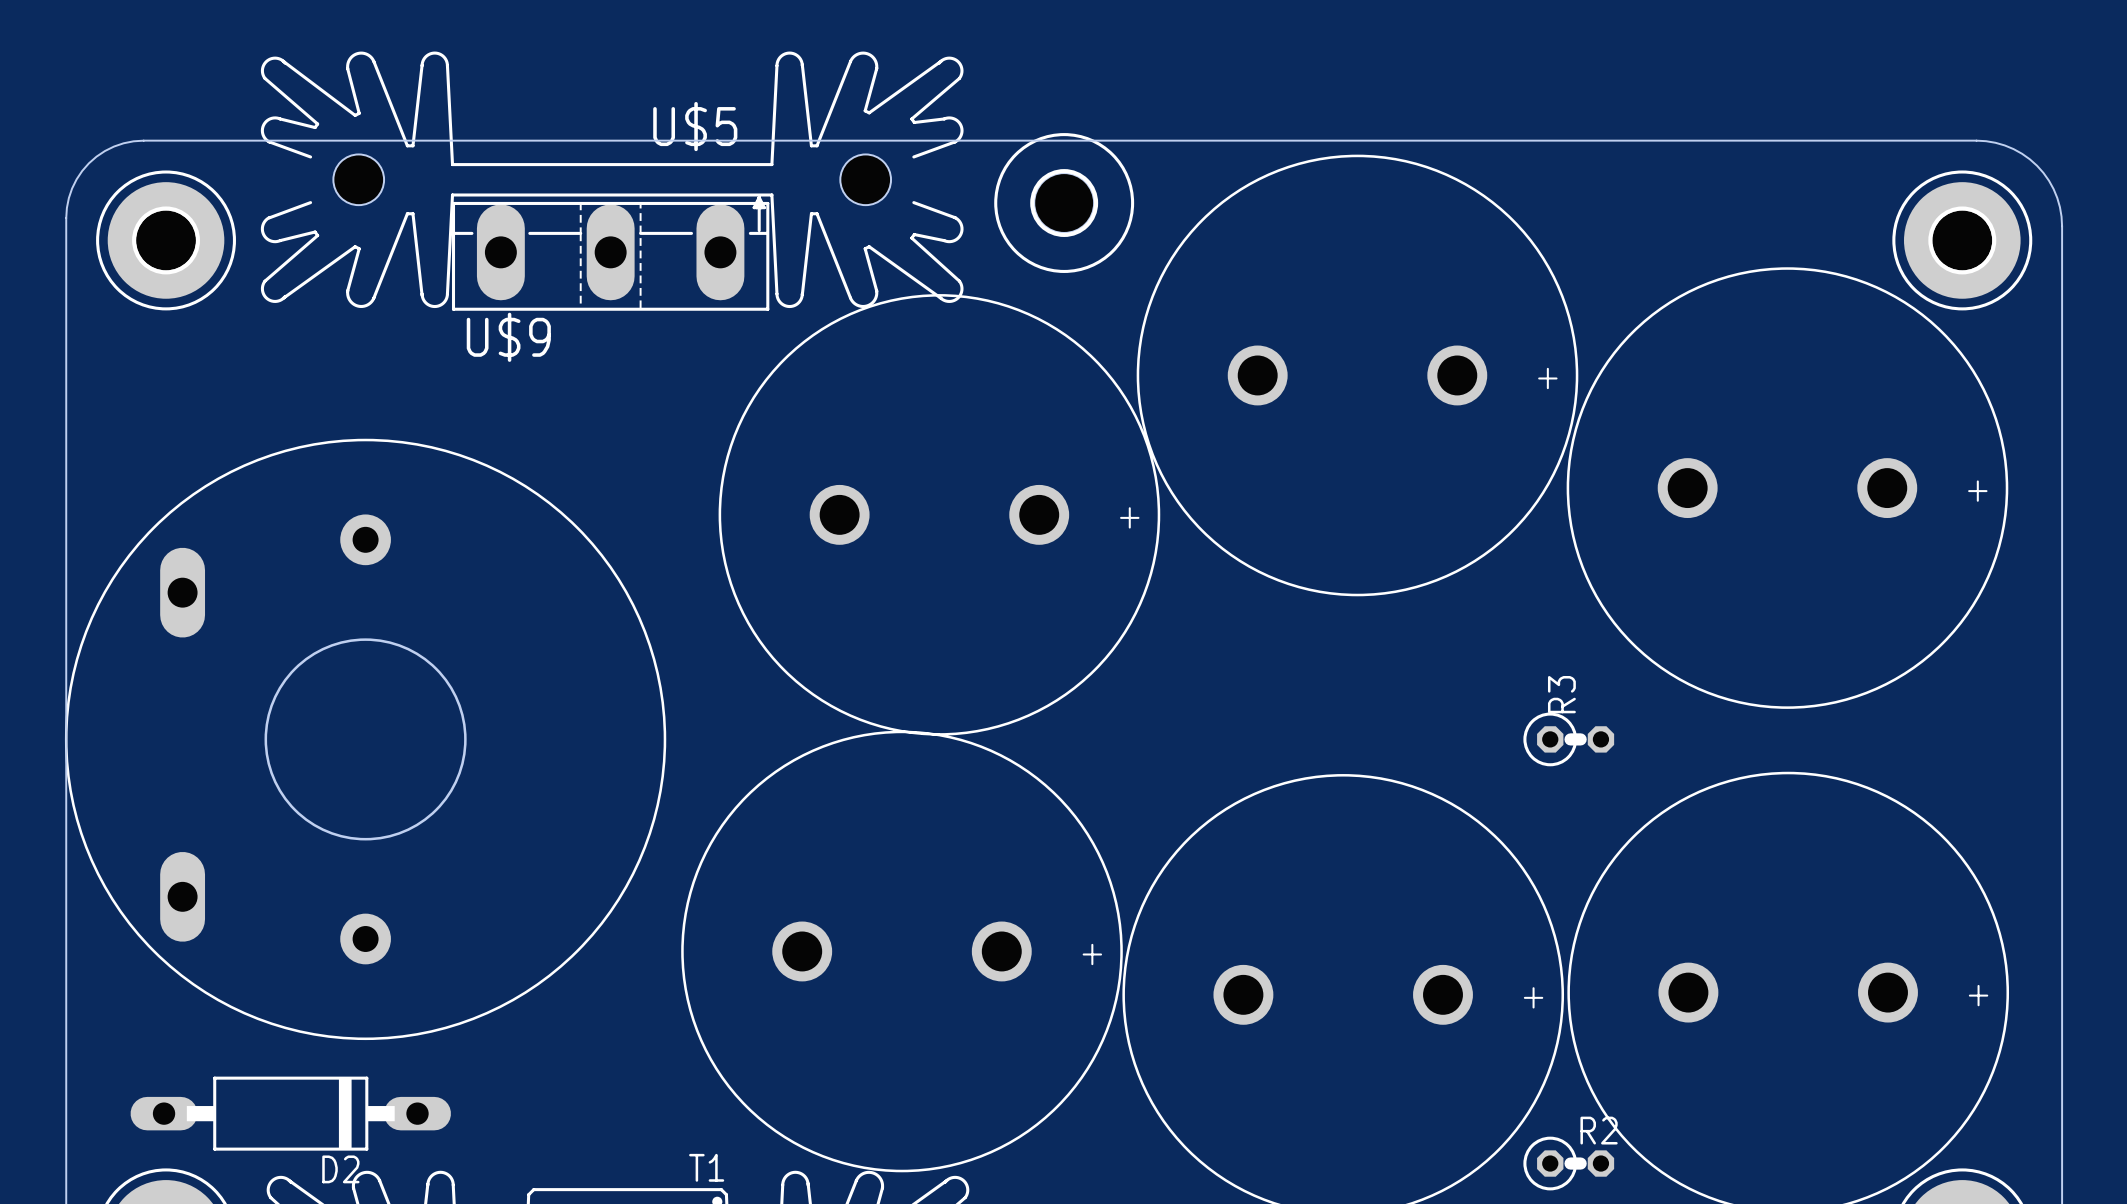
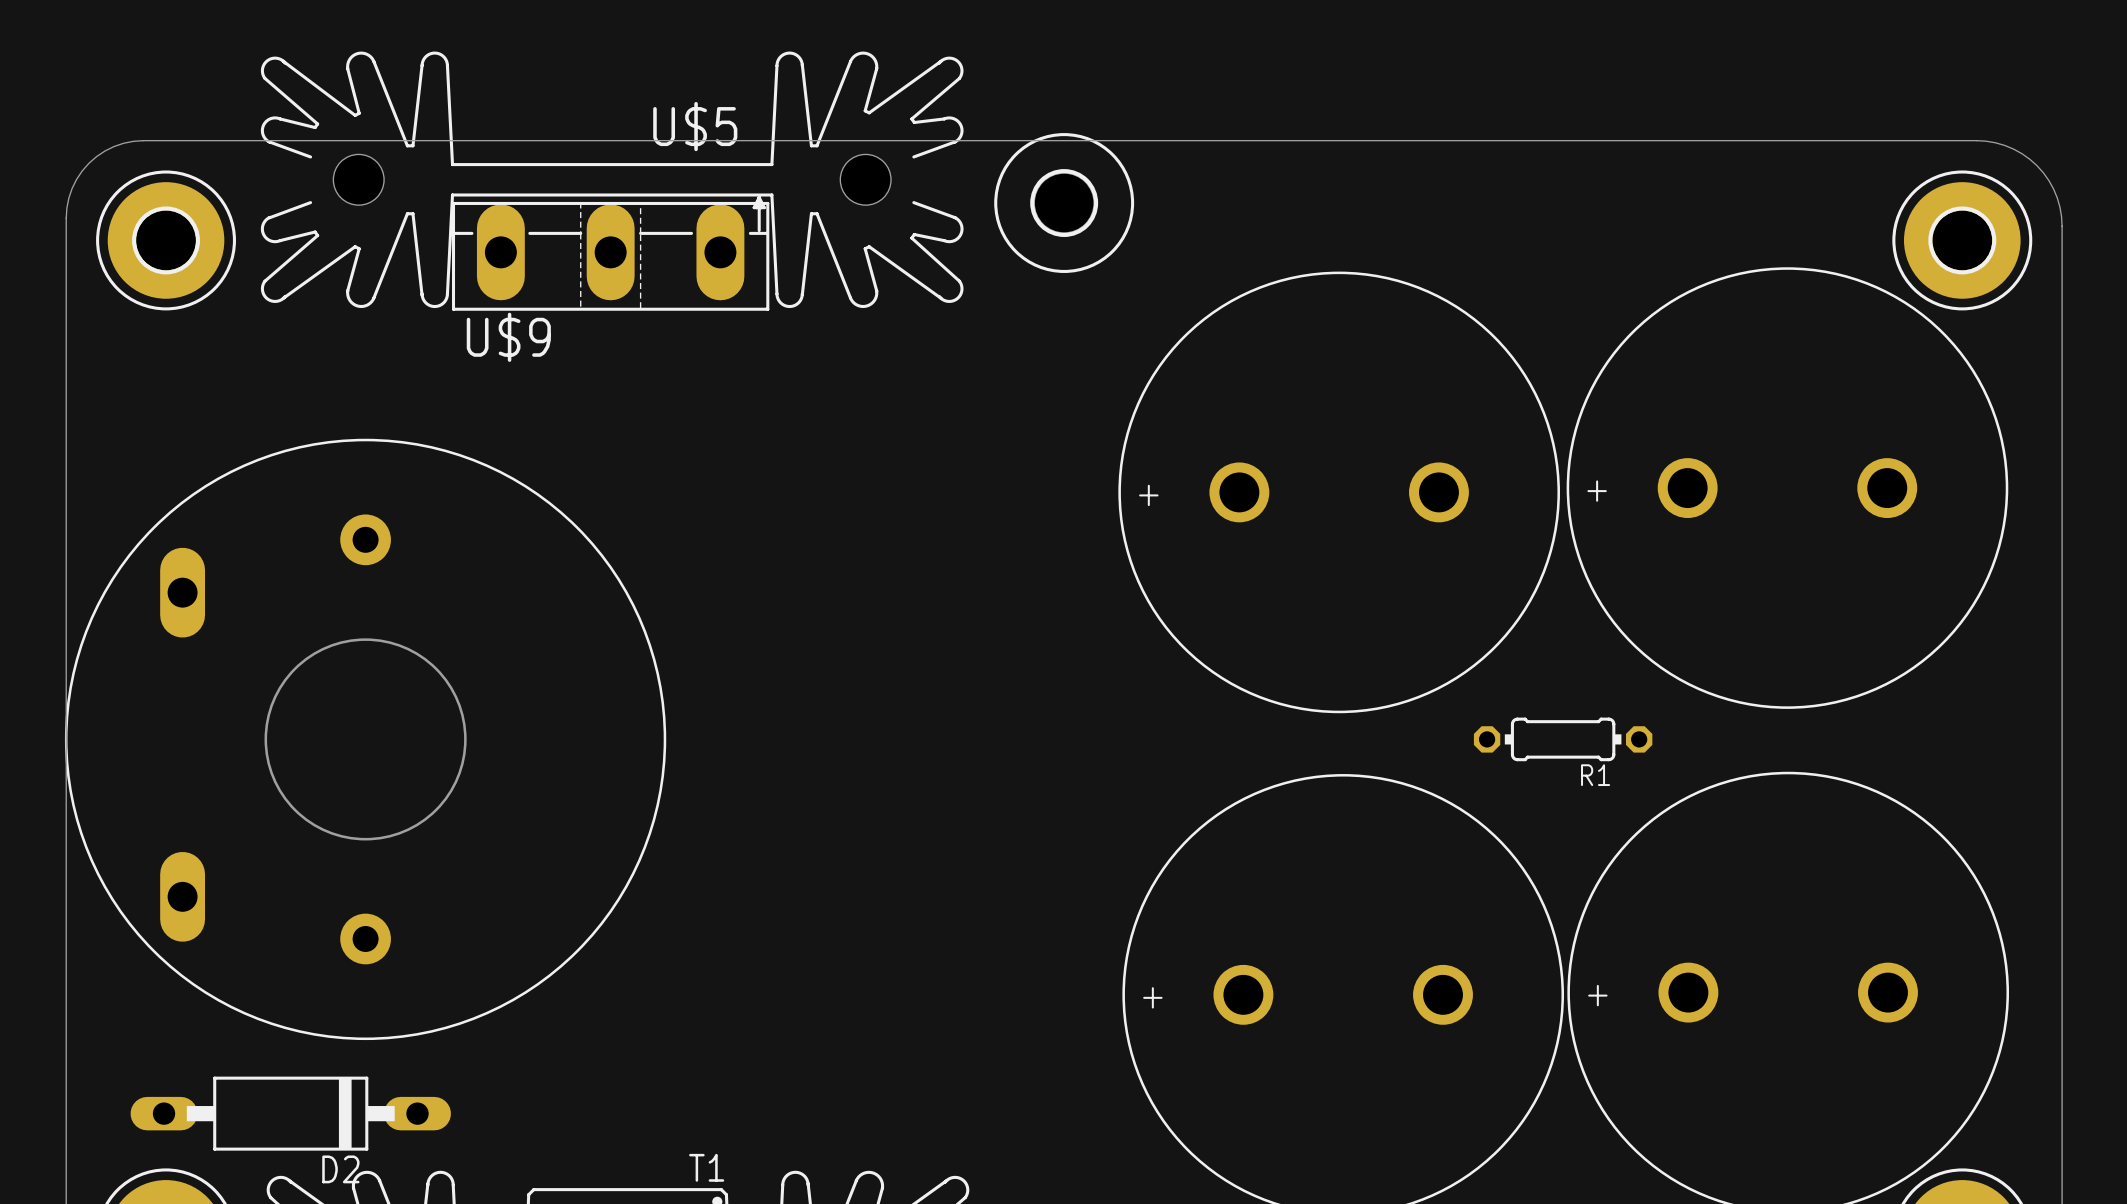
part: (1357, 375) -> none
part text position: + (1977, 491) -> + (1597, 491)
part: none -> (1339, 492)
part: (939, 514) -> none
R1: none -> (1563, 739)
R3: (1568, 739) -> none
part: (902, 951) -> none
part text position: + (1978, 995) -> + (1597, 995)
part text position: + (1533, 997) -> + (1152, 997)
R2: (1568, 1163) -> none

